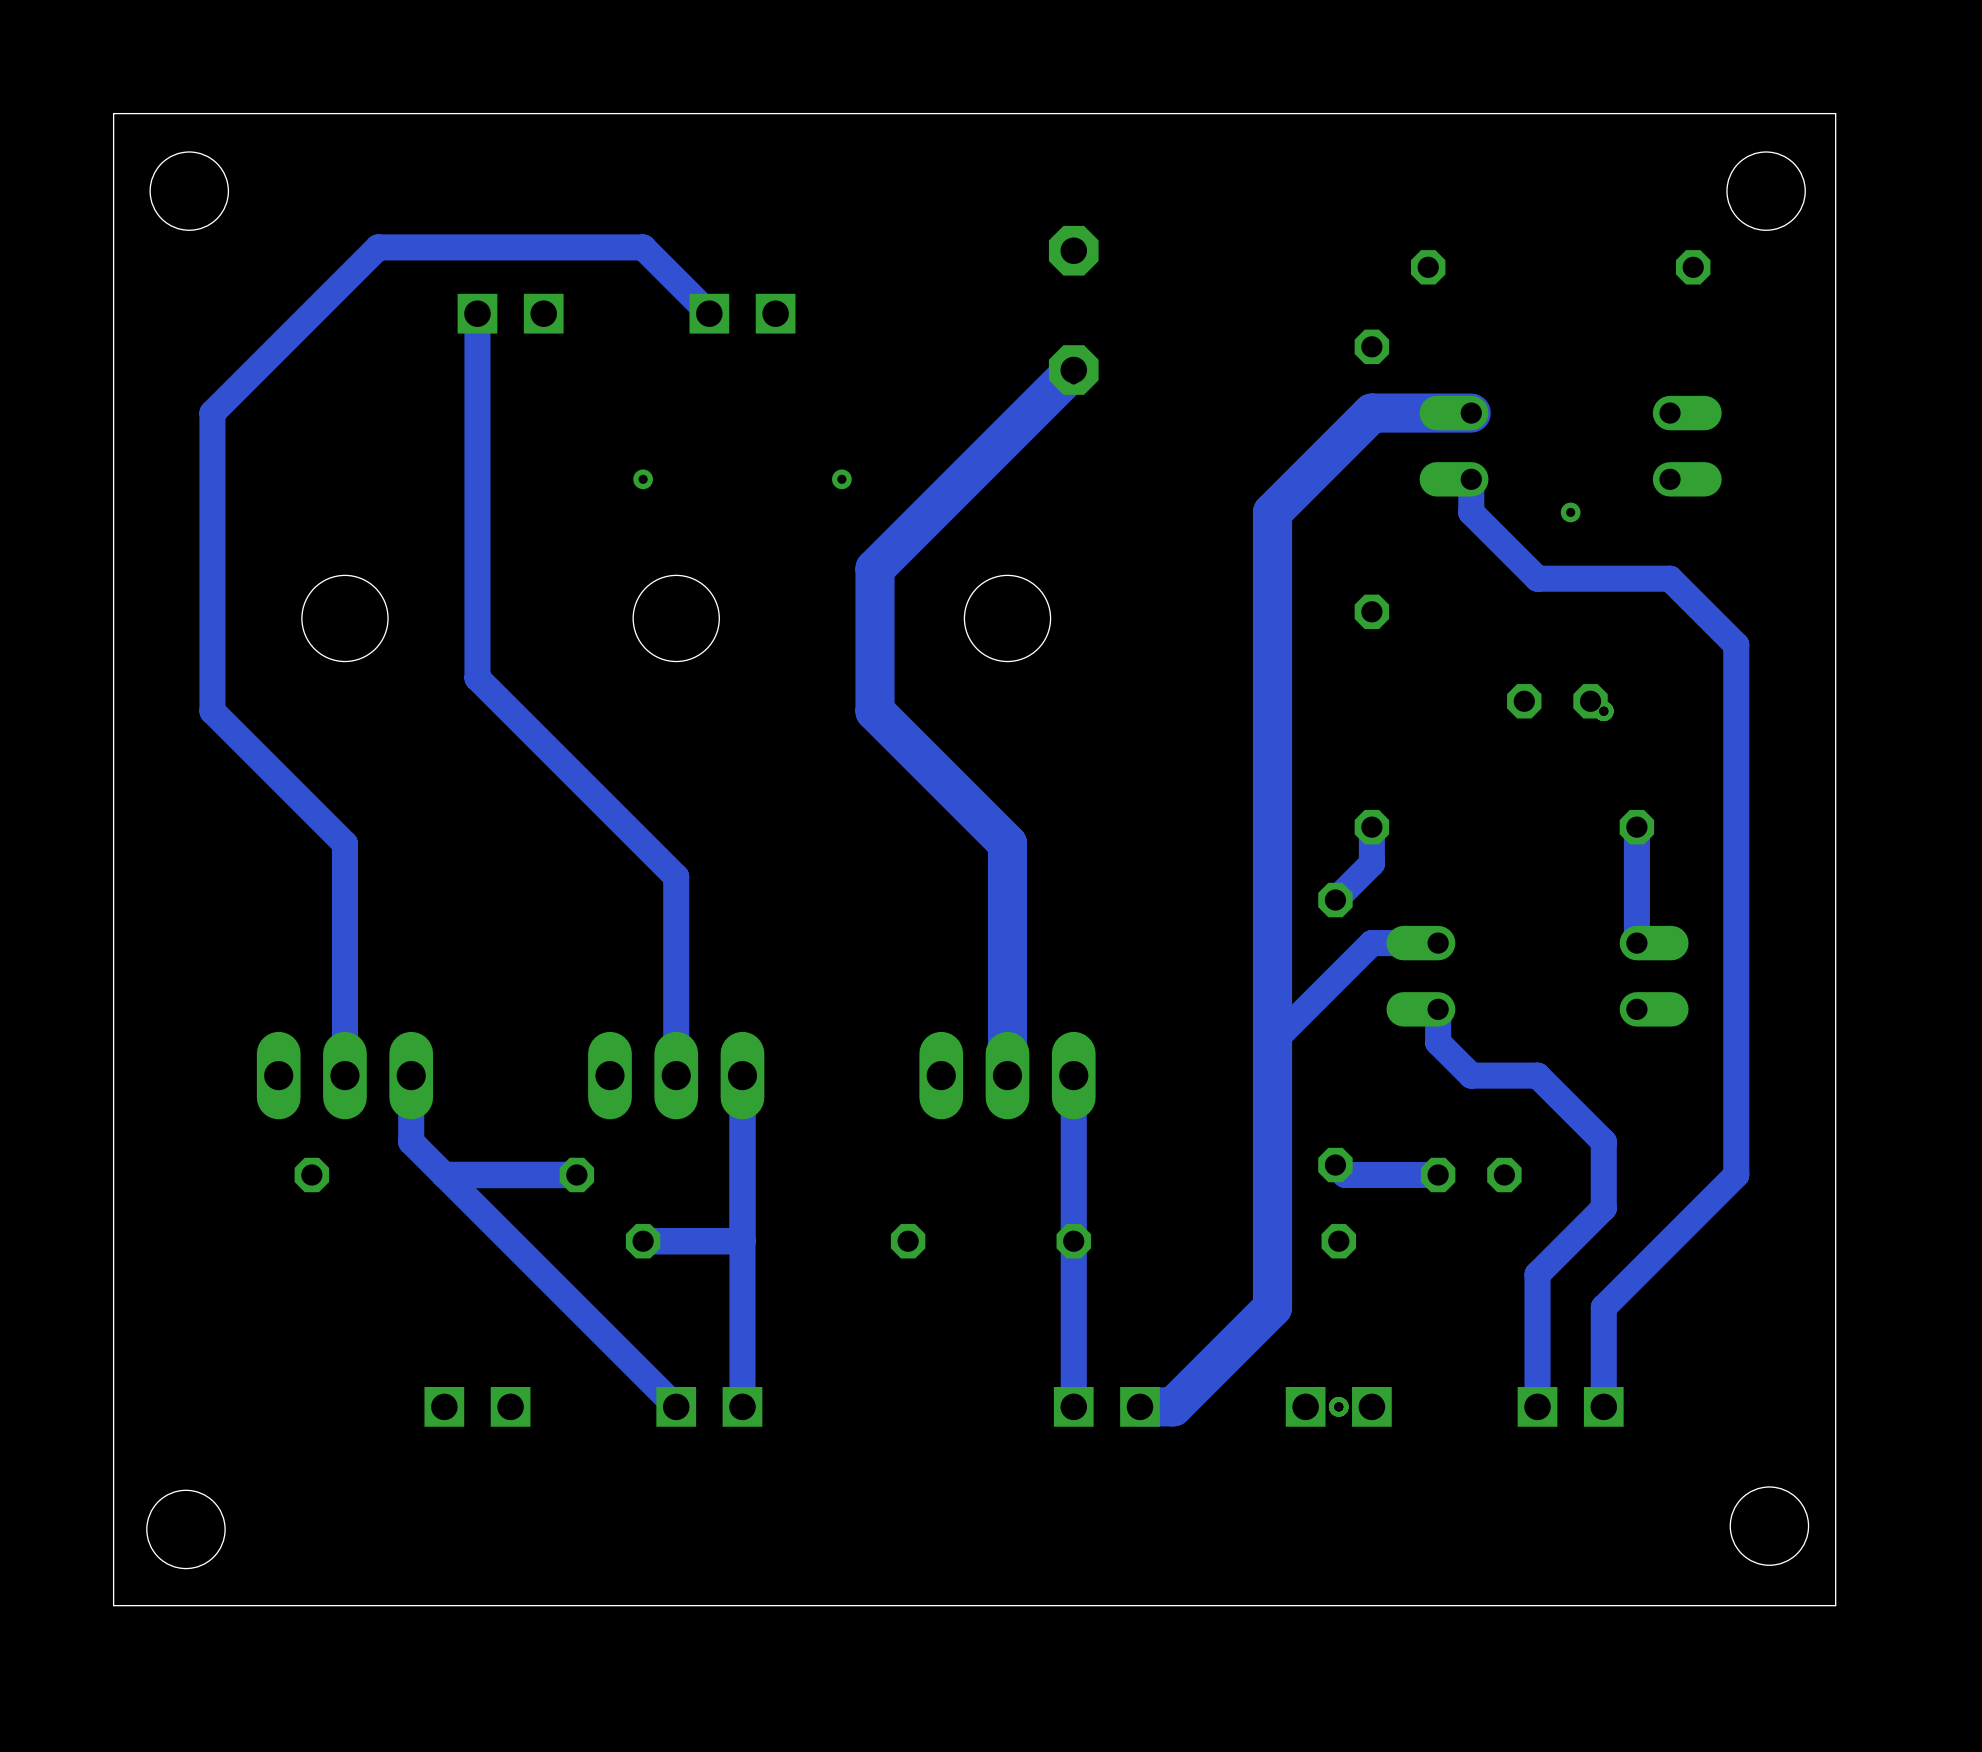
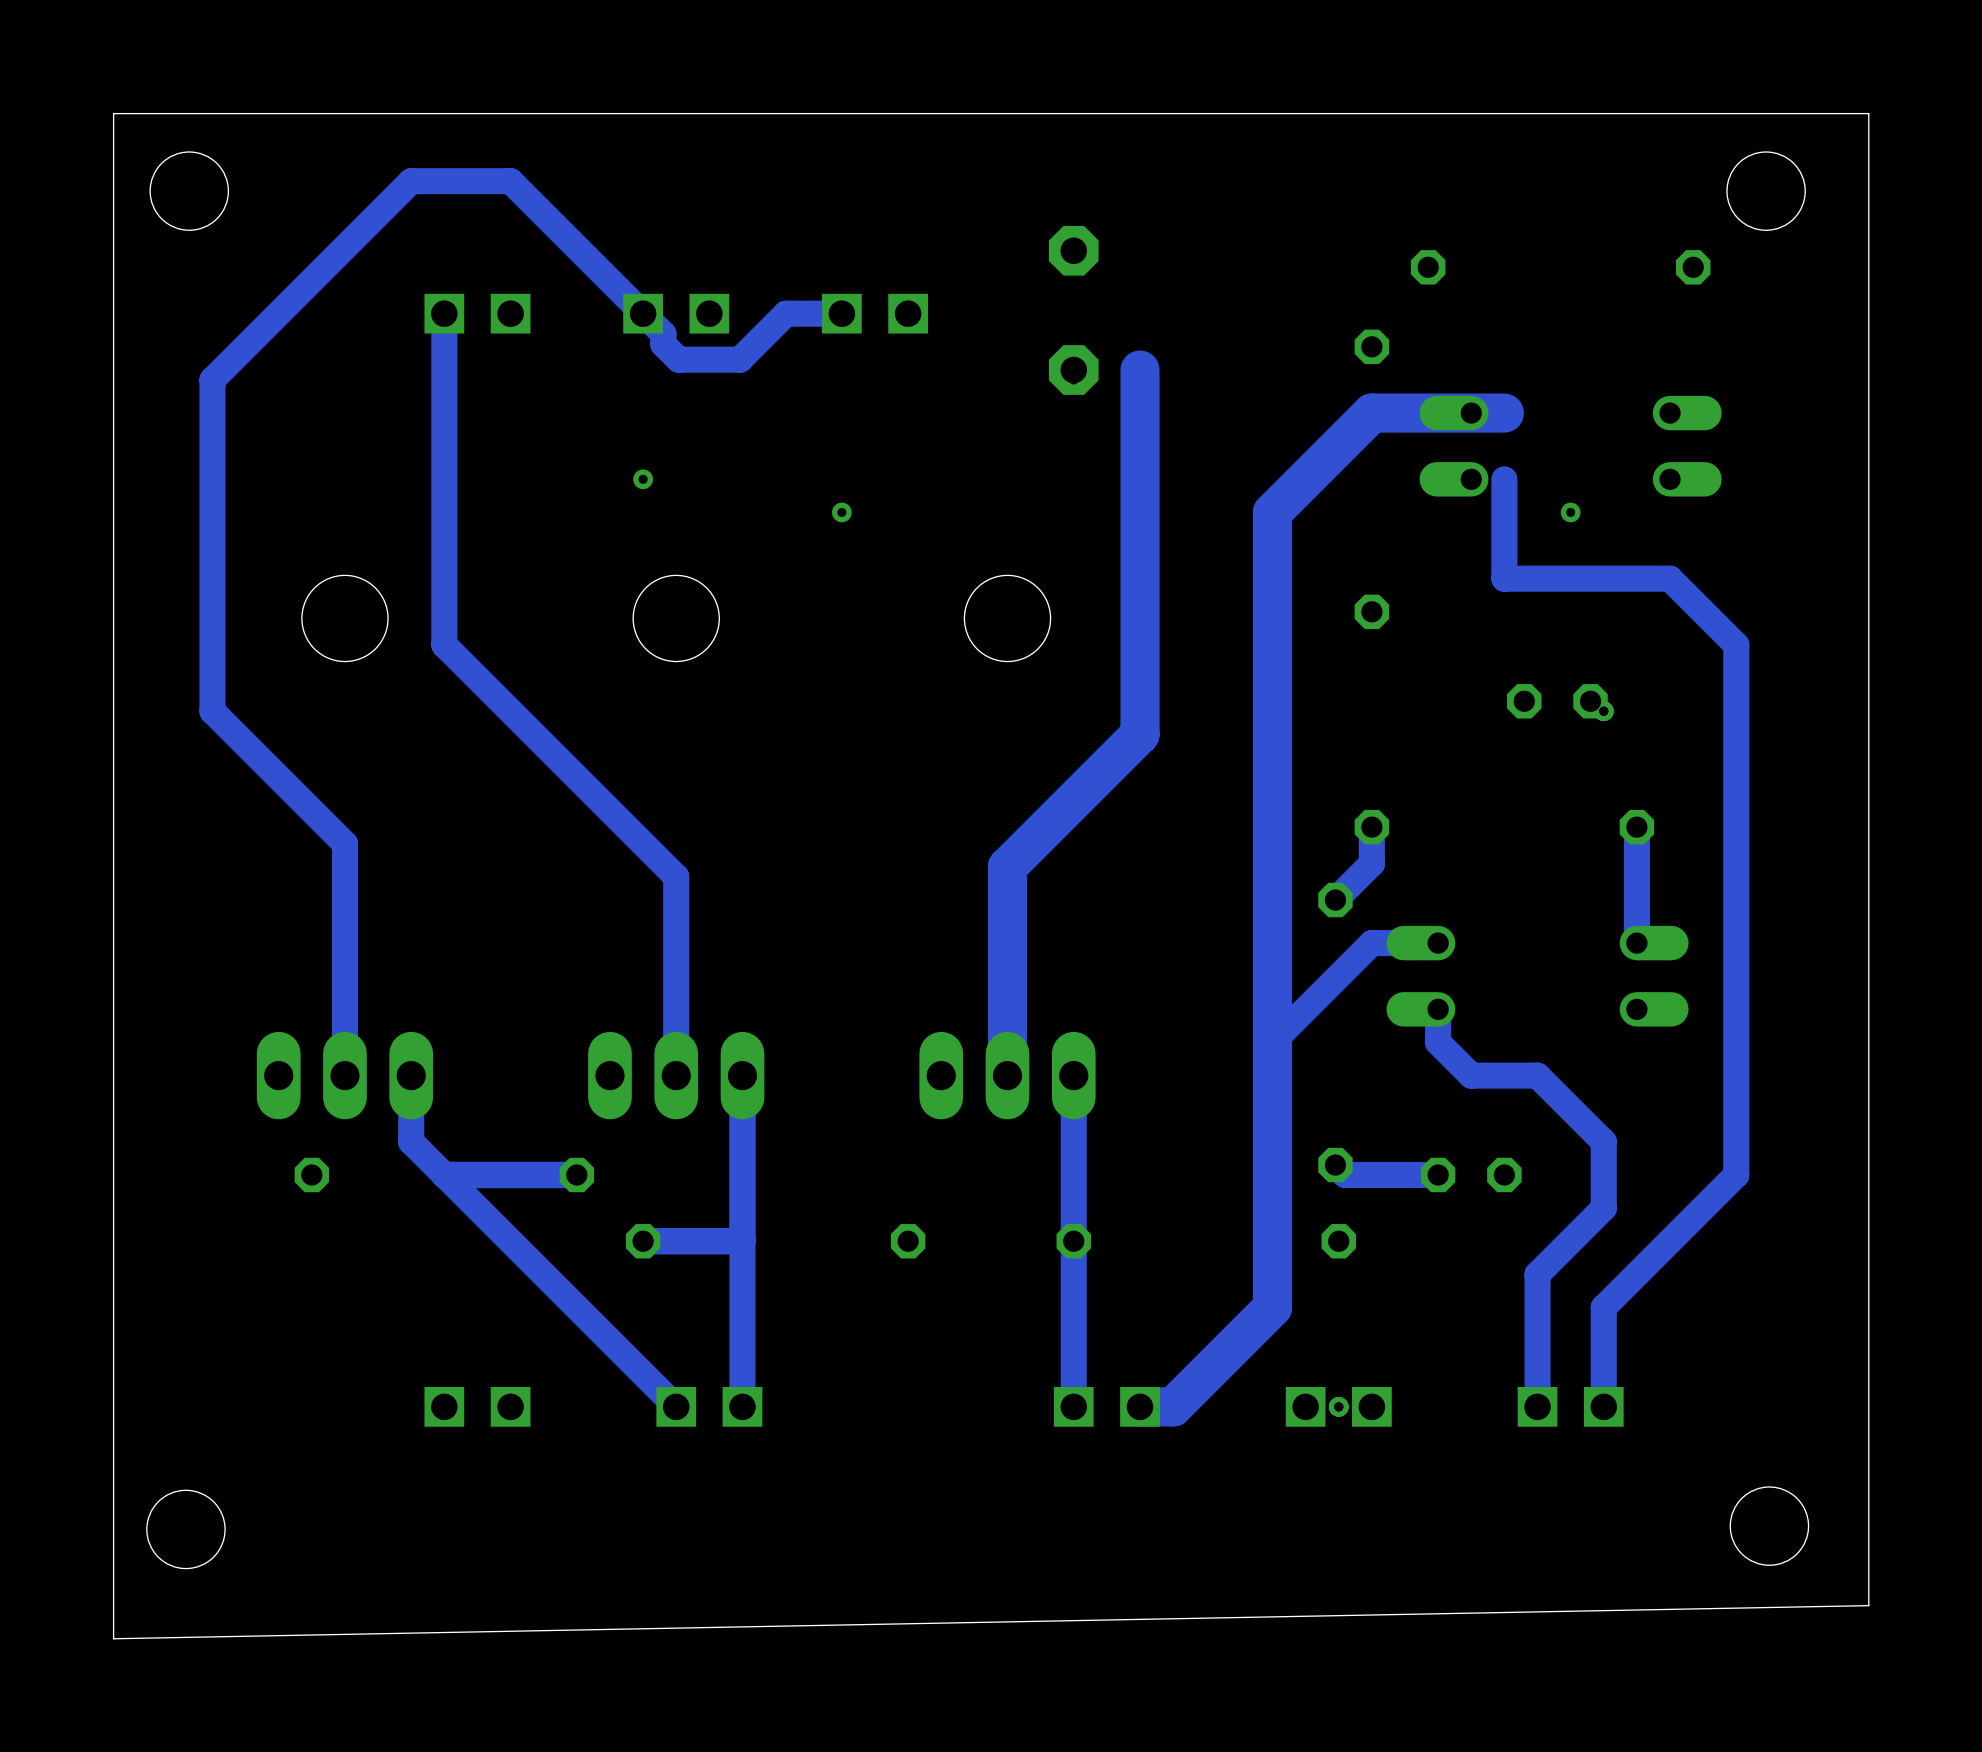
board edge: (1835, 113) (1835, 1605) (113, 1605) -> (1835, 113) (1868, 113) (1868, 1605) (113, 1638) (113, 1605)
track: (477, 313) (477, 678) -> (444, 313) (444, 644) (477, 678)
part position: (510, 313) -> (477, 313)
part: none -> (676, 313)
track: (709, 313) (643, 247) (378, 247) (212, 413) -> (841, 313) (786, 313) (740, 359) (678, 359) (663, 344) (663, 333) (510, 181) (411, 181) (212, 379) (212, 413)
part: (742, 313) -> none
part: none -> (874, 313)
track: (1073, 370) (874, 568) (874, 711) (1007, 843) (1007, 866) -> (1140, 370) (1140, 734) (1007, 866)
track: none -> (1504, 413) (1471, 413)
via position: (841, 479) -> (841, 512)
track: (1471, 479) (1471, 512) (1537, 578) -> (1504, 479) (1504, 578) (1537, 578)

